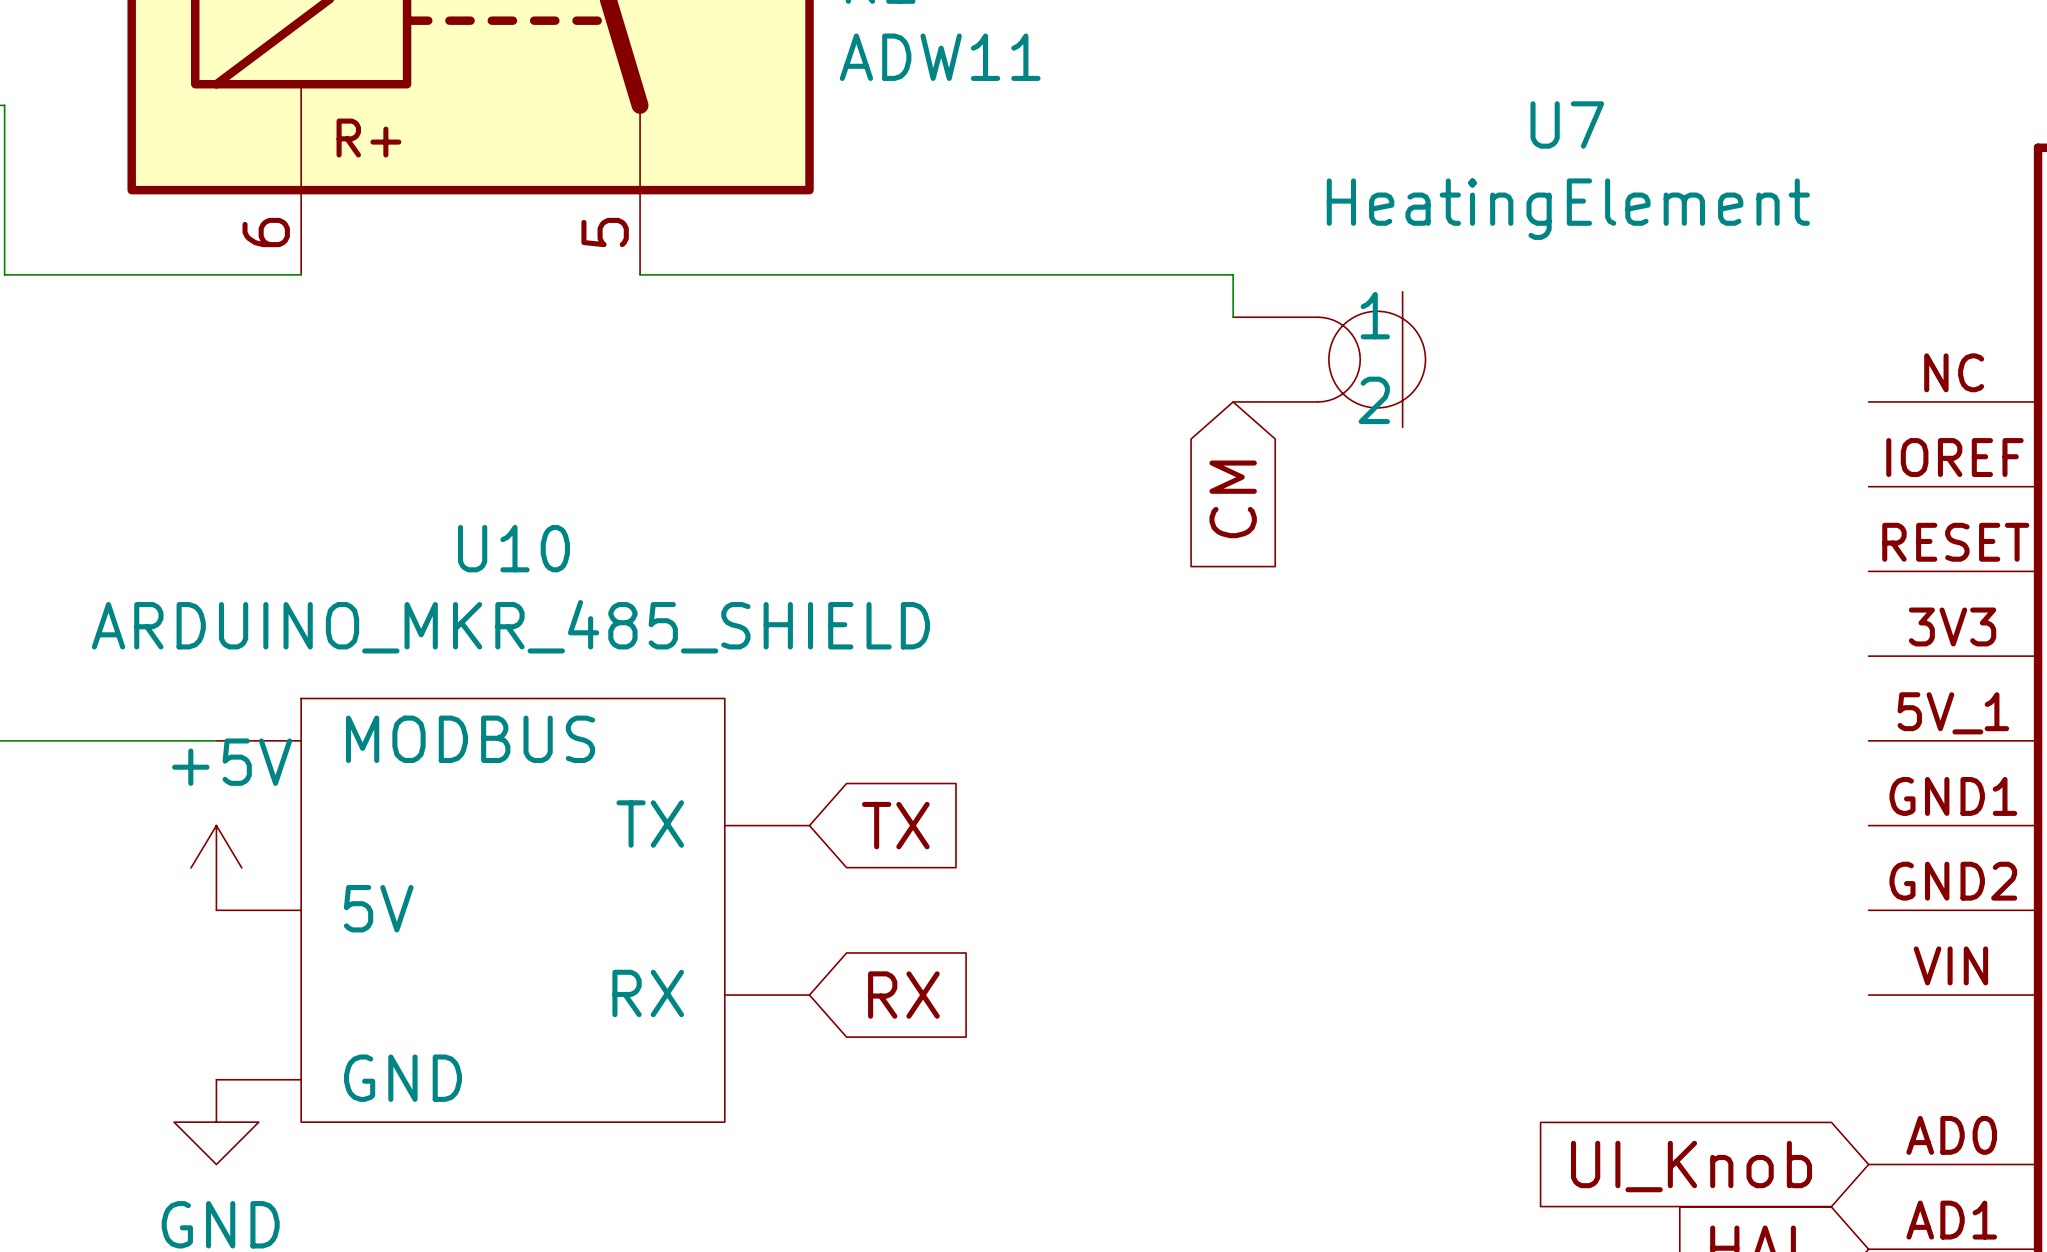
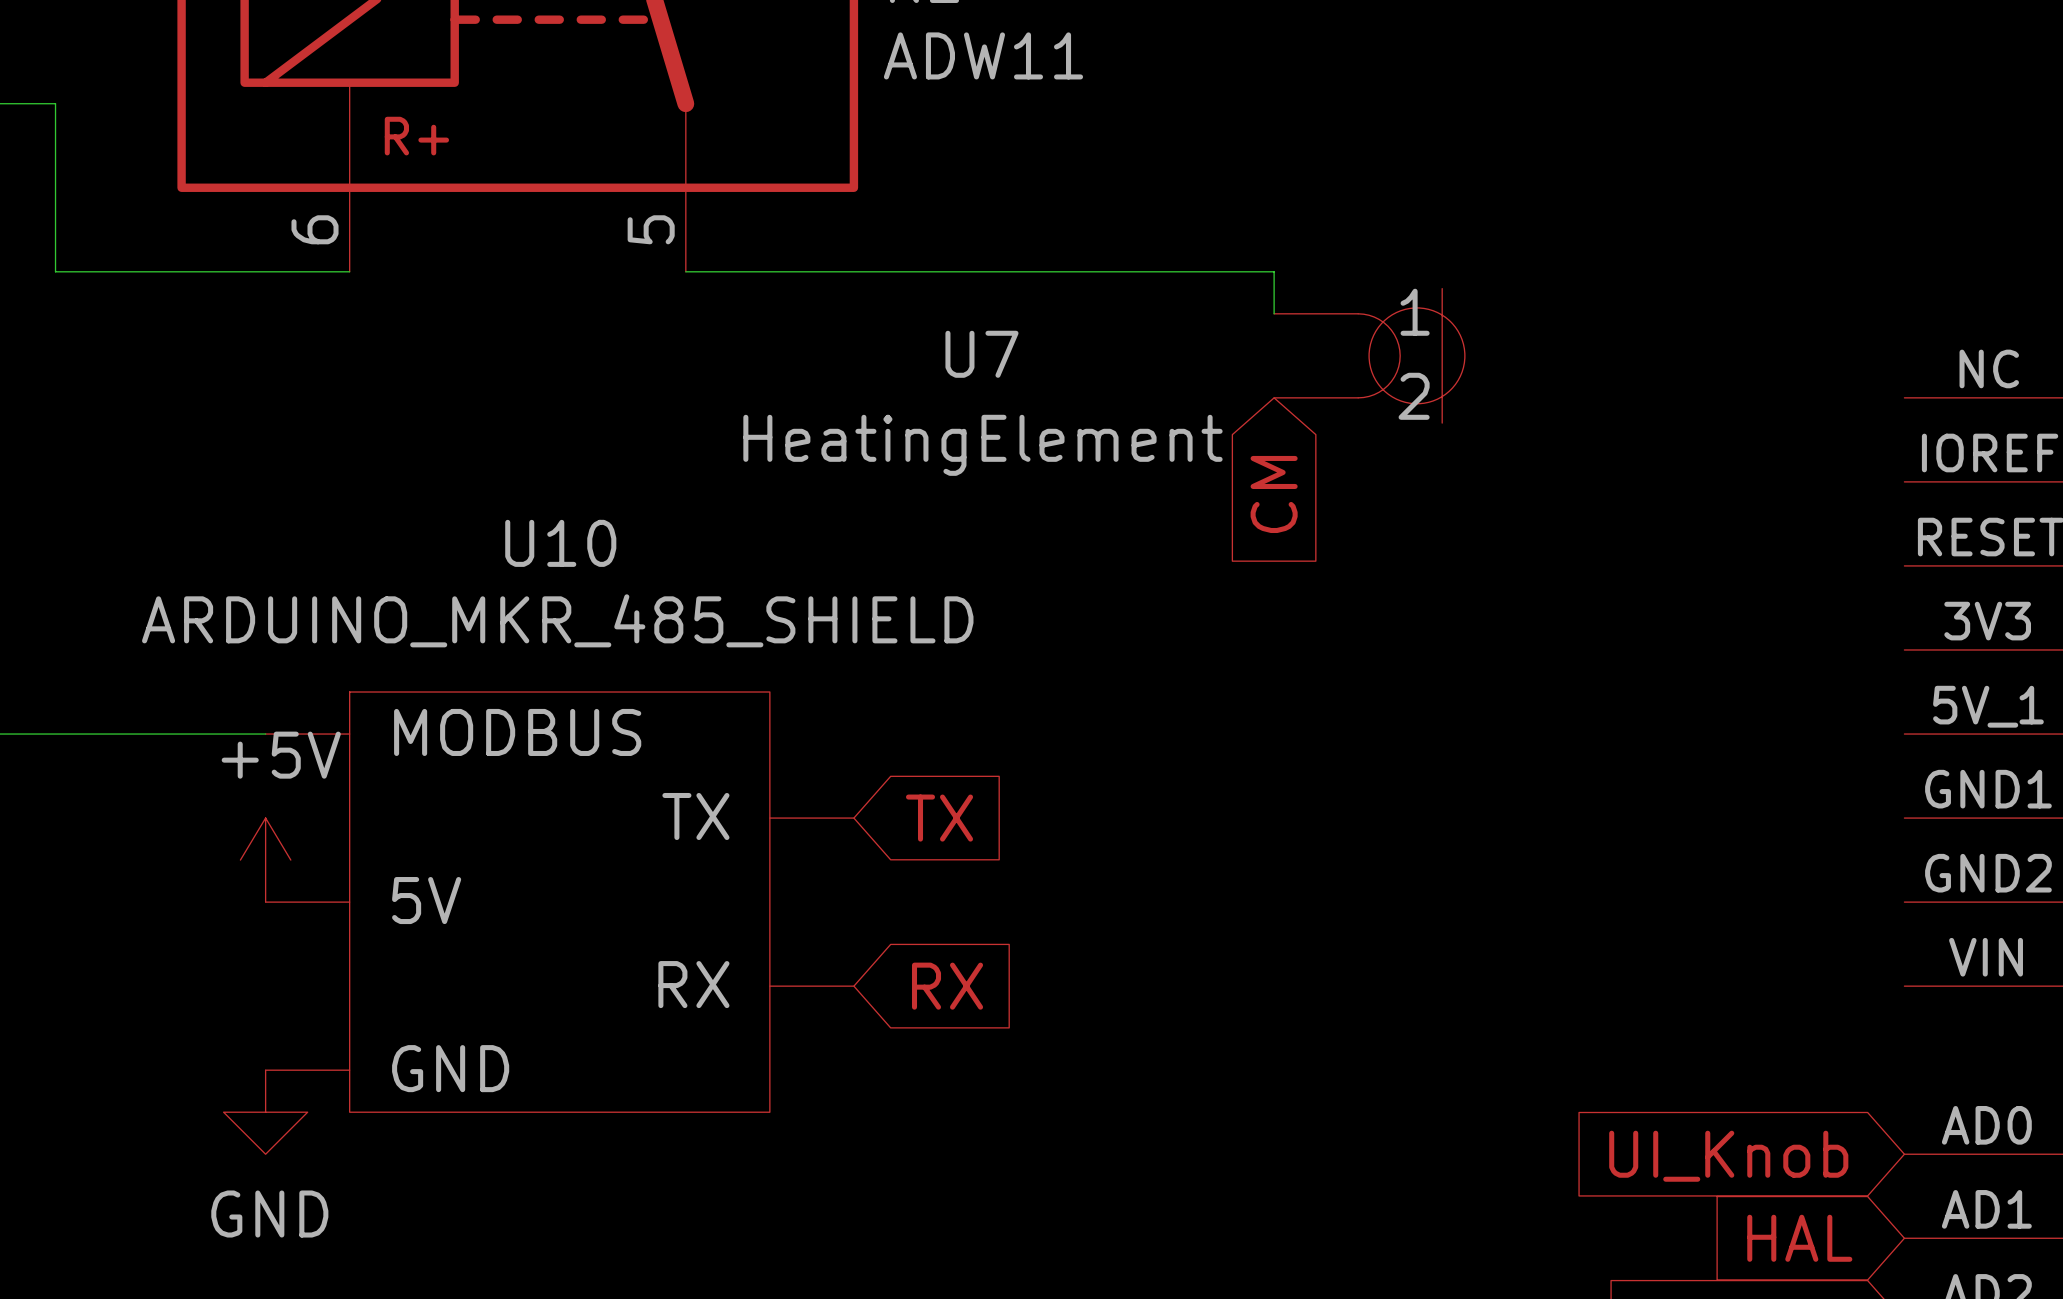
U7 name position: U7 (1567, 125) -> U7 (981, 354)
U7 value position: HeatingElement (1568, 209) -> HeatingElement (982, 445)

